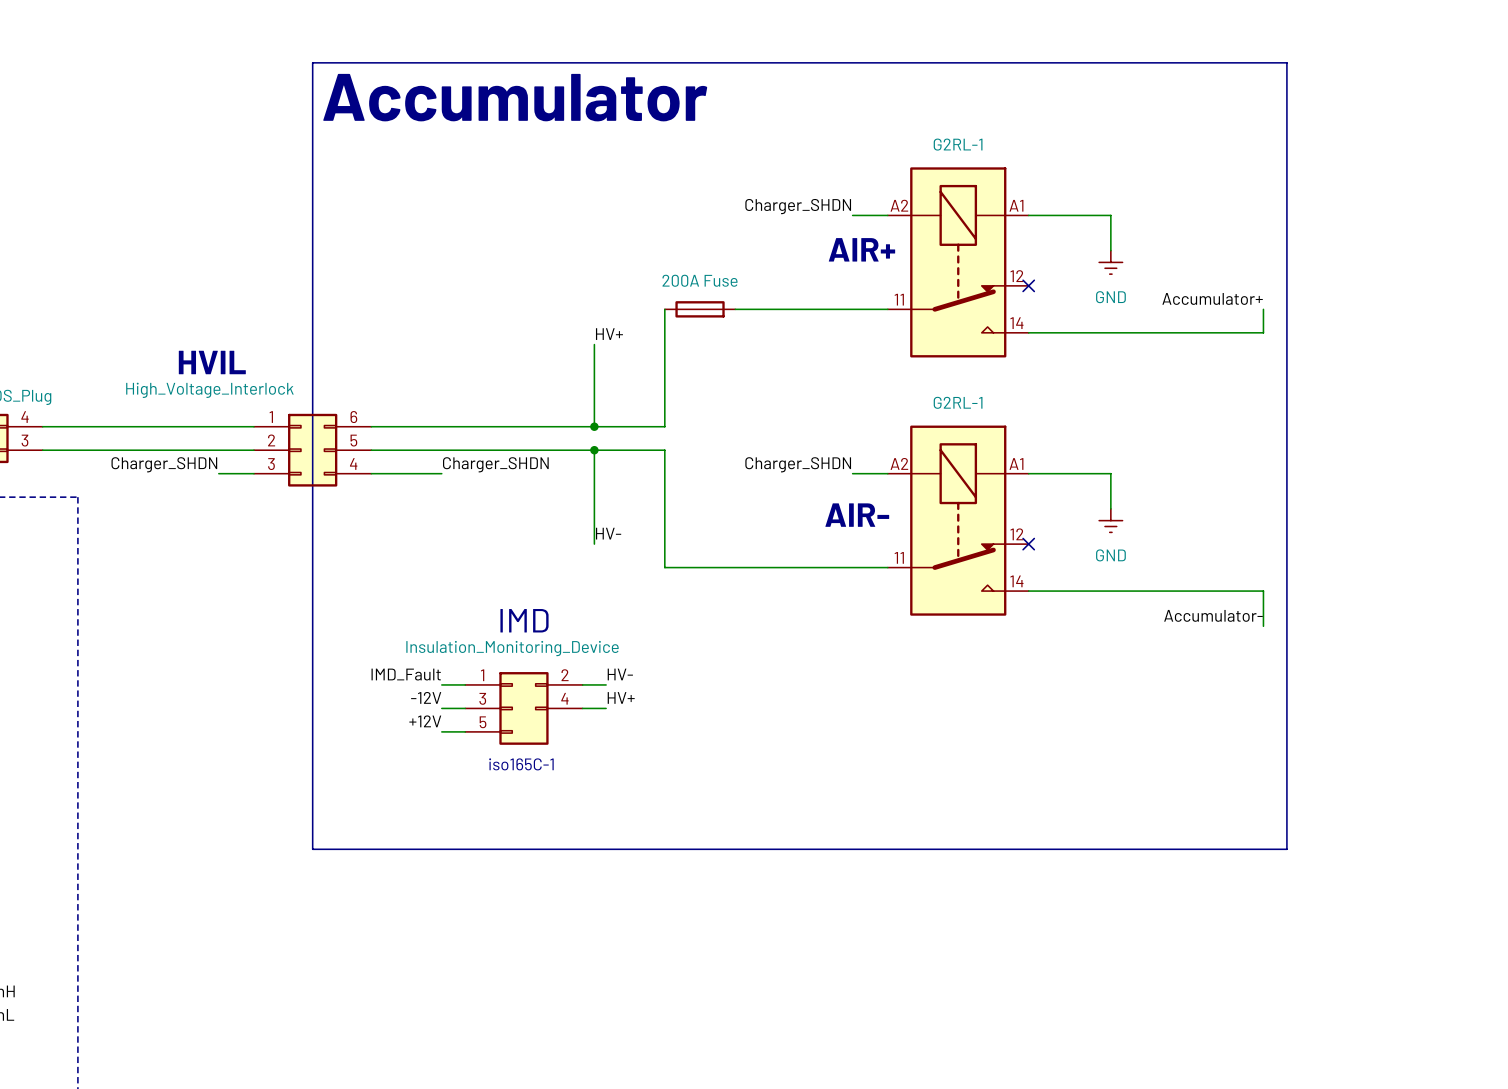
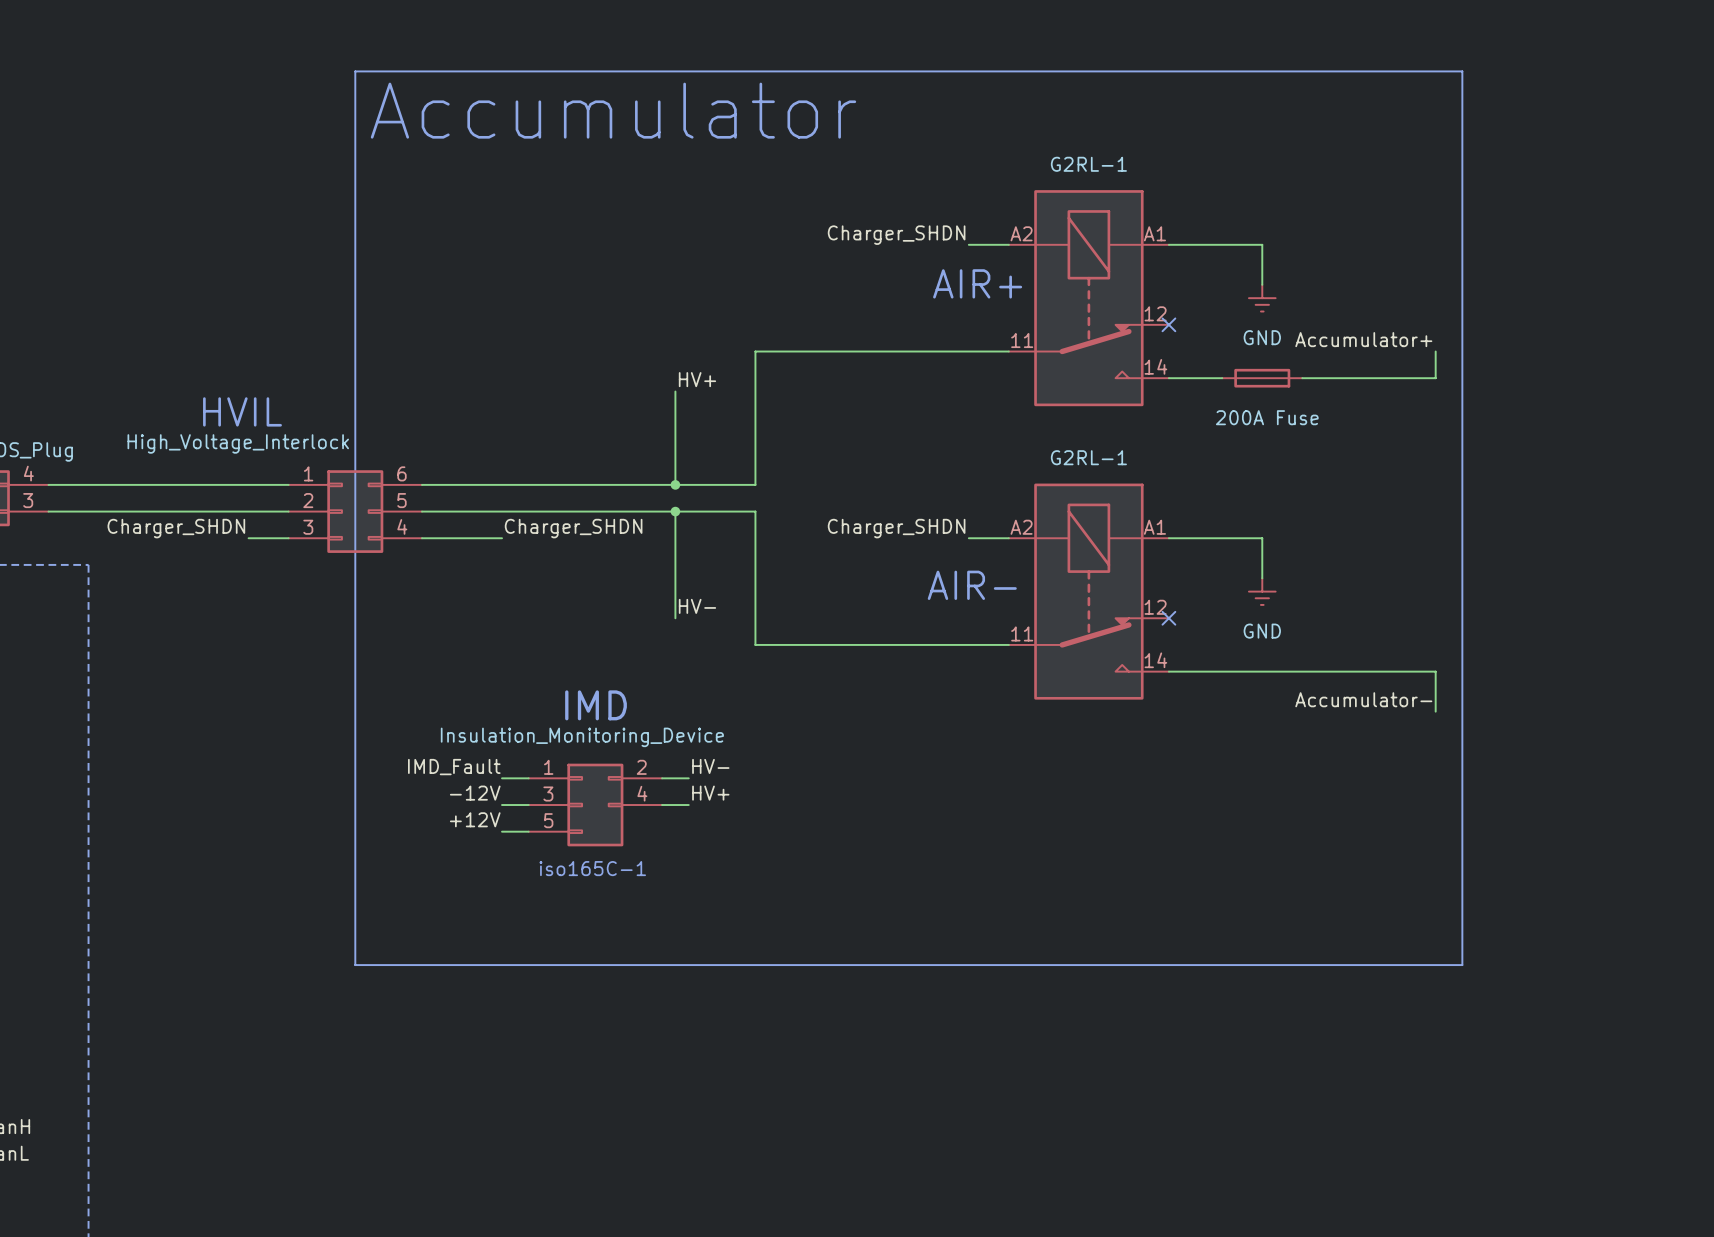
part: 200A Fuse (700, 309) -> none
part: none -> 200A Fuse (1262, 378)

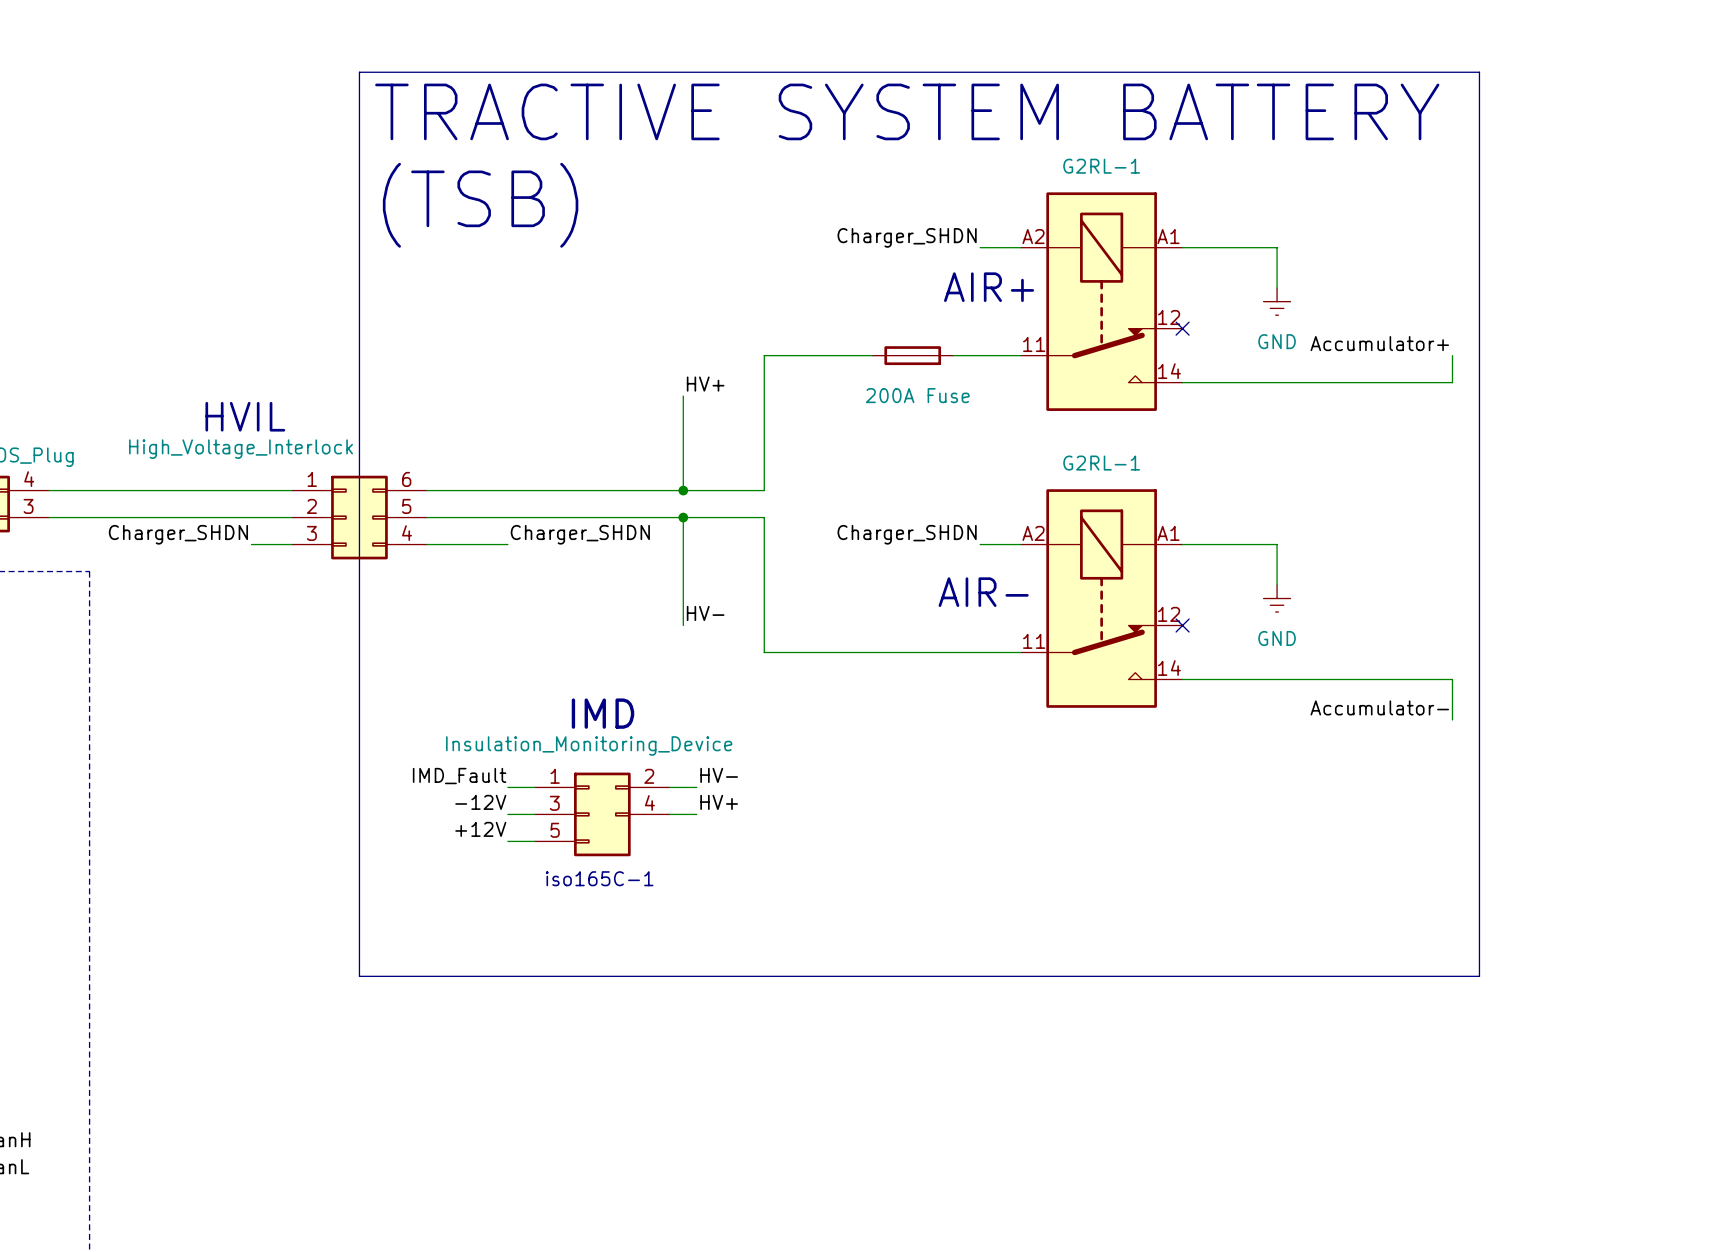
text: Accumulator (613, 110) -> TRACTIVE SYSTEM BATTERY (907, 111)
text: none -> (TSB) (480, 205)
part: none -> 200A Fuse (912, 355)
part: 200A Fuse (1262, 378) -> none

